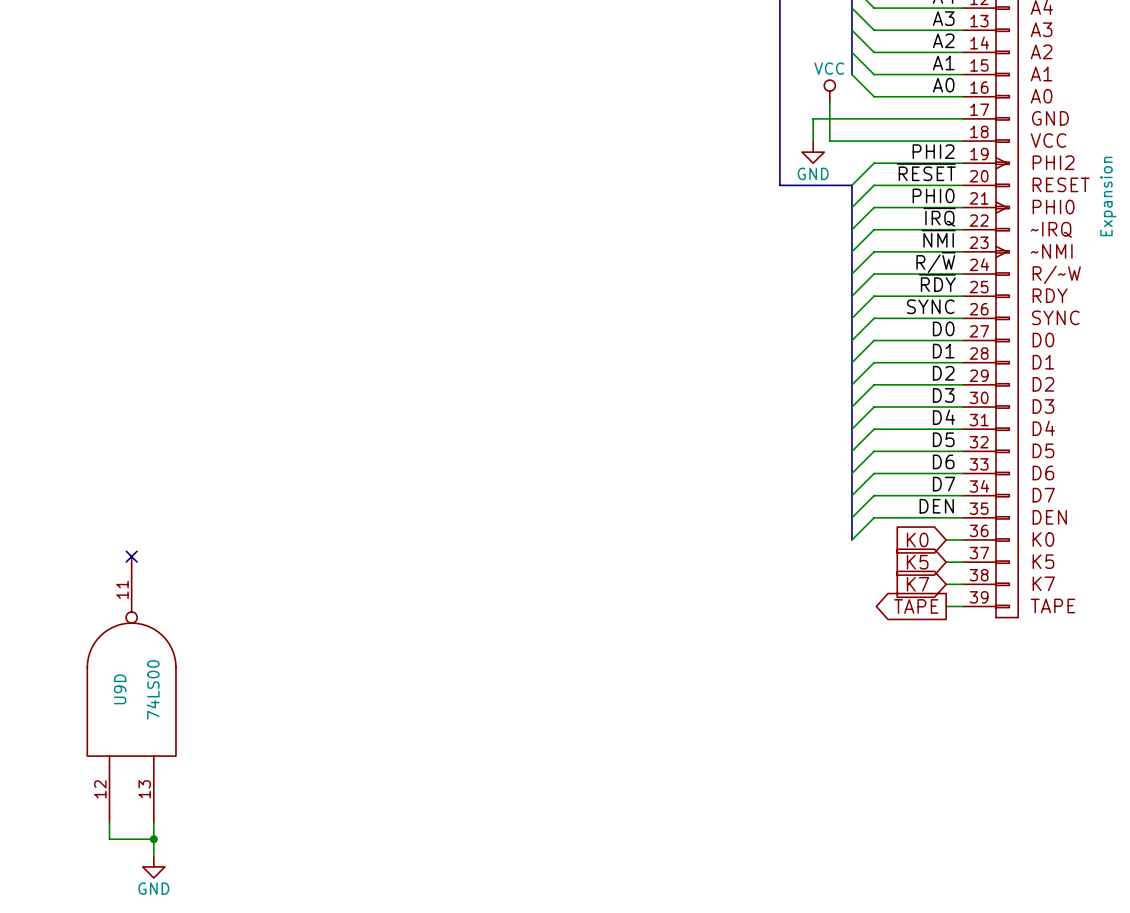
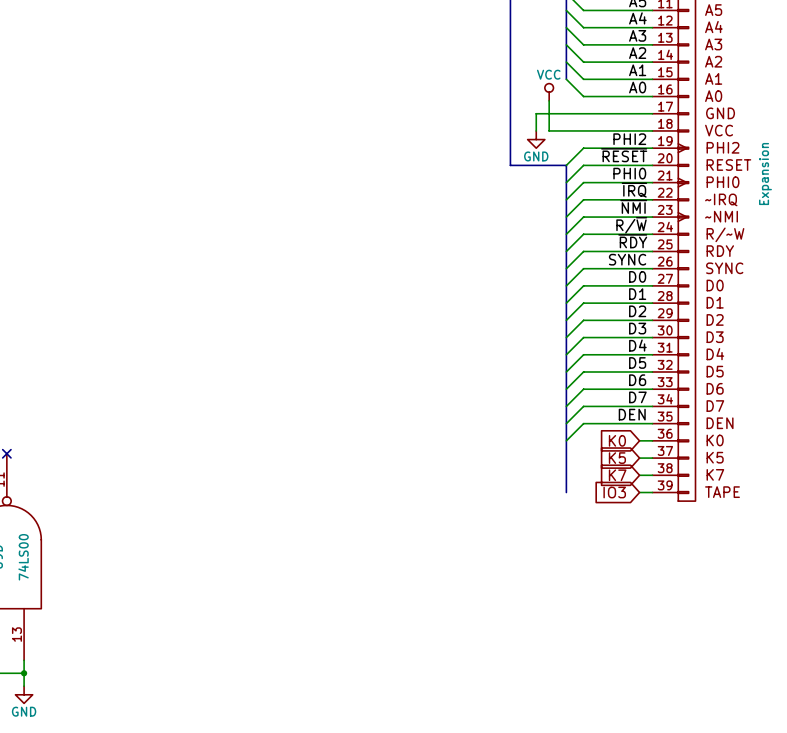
bus: none -> (566, 440) (566, 492)
global label shape: output (916, 606) -> input (614, 492)
global label: TAPE (916, 606) -> IO3 (614, 492)

